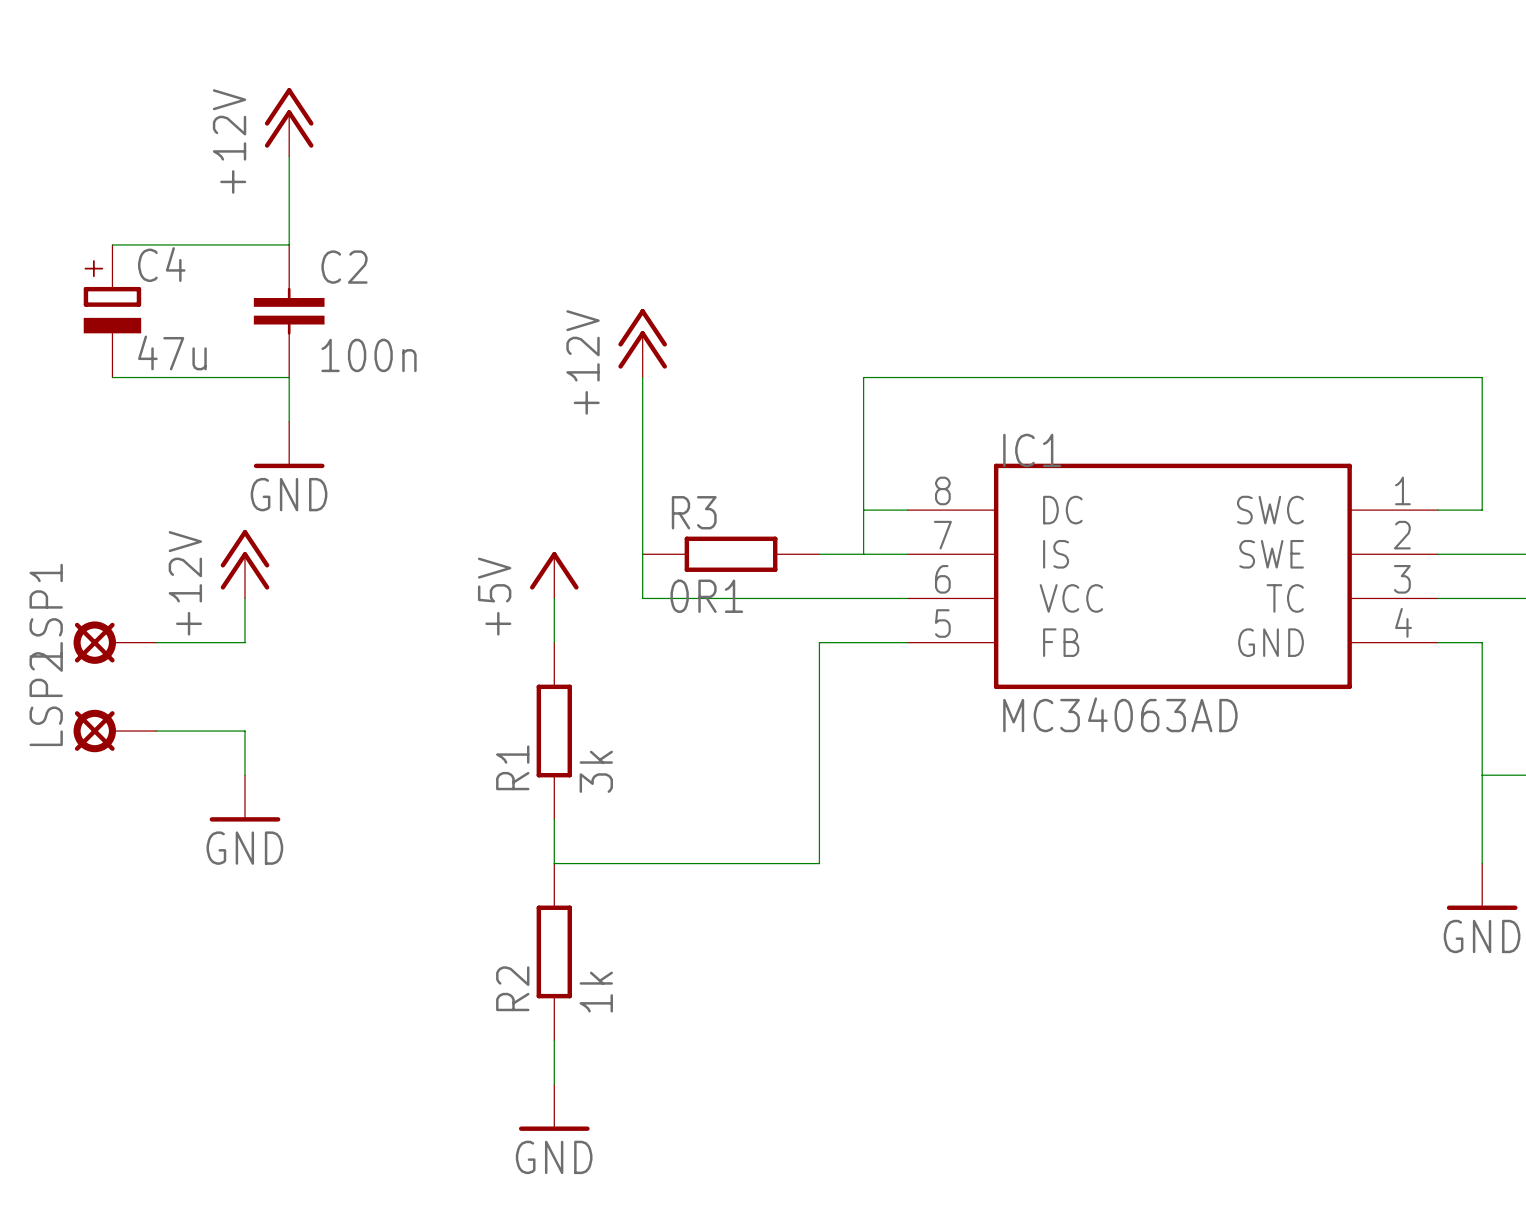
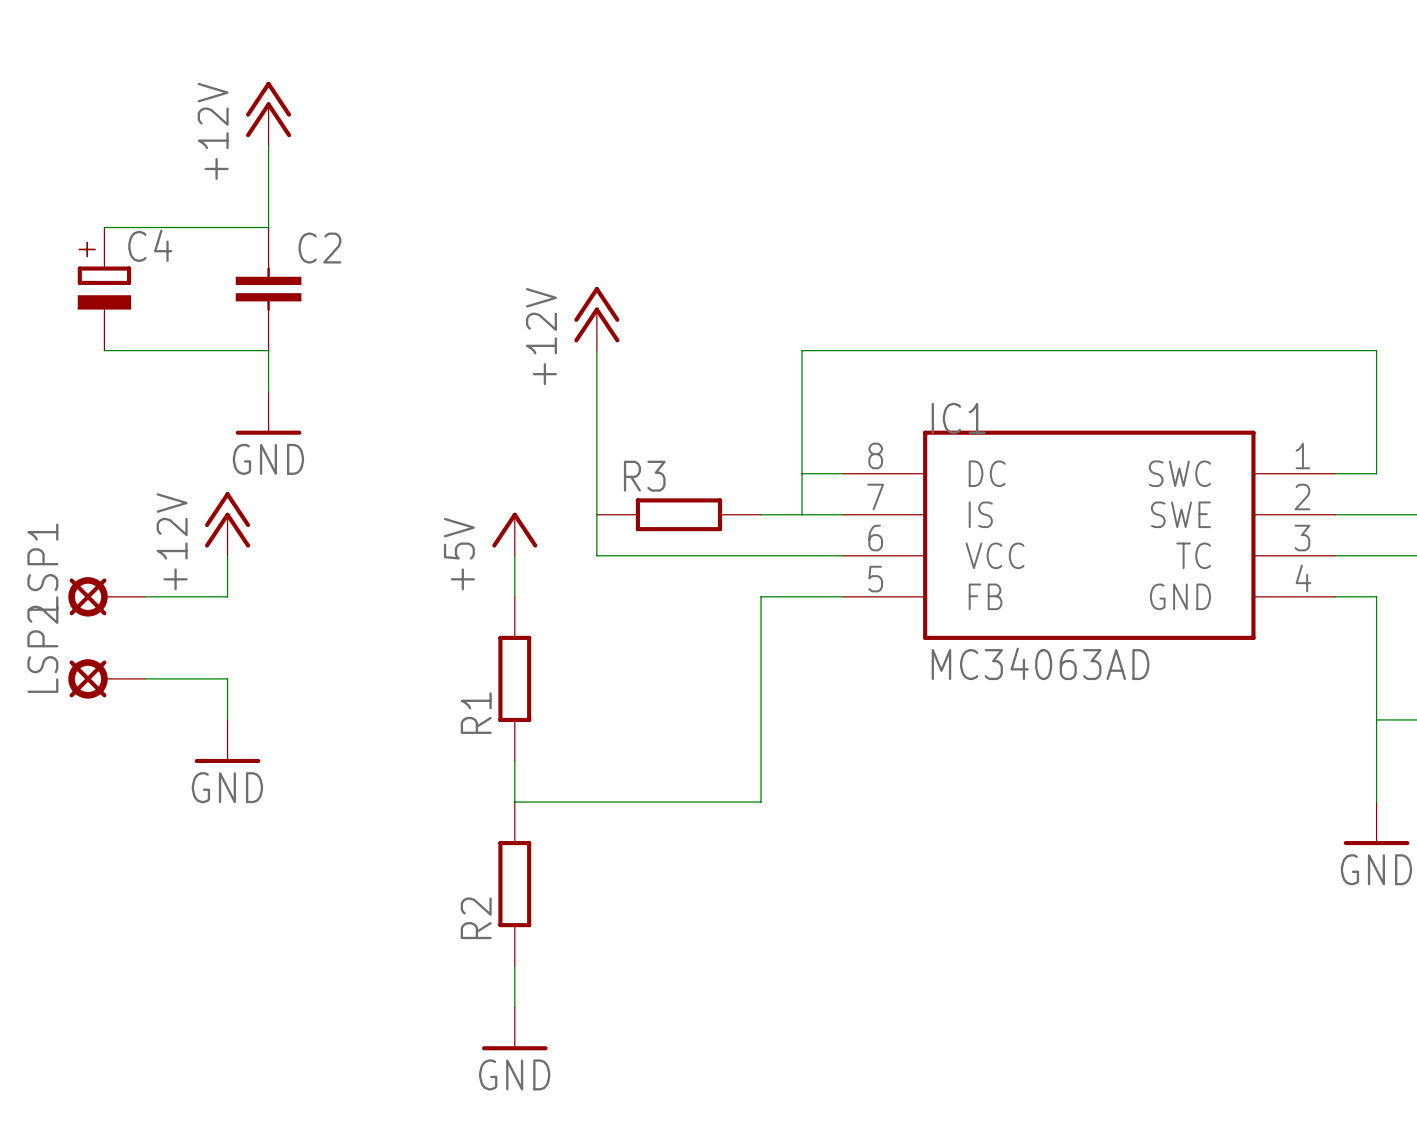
C4 value: 47u (172, 352) -> none
C2 value: 100n (369, 355) -> none
R3 value: 0R1 (706, 596) -> none
R1 value: 3k (596, 771) -> none
R2 value: 1k (596, 992) -> none

